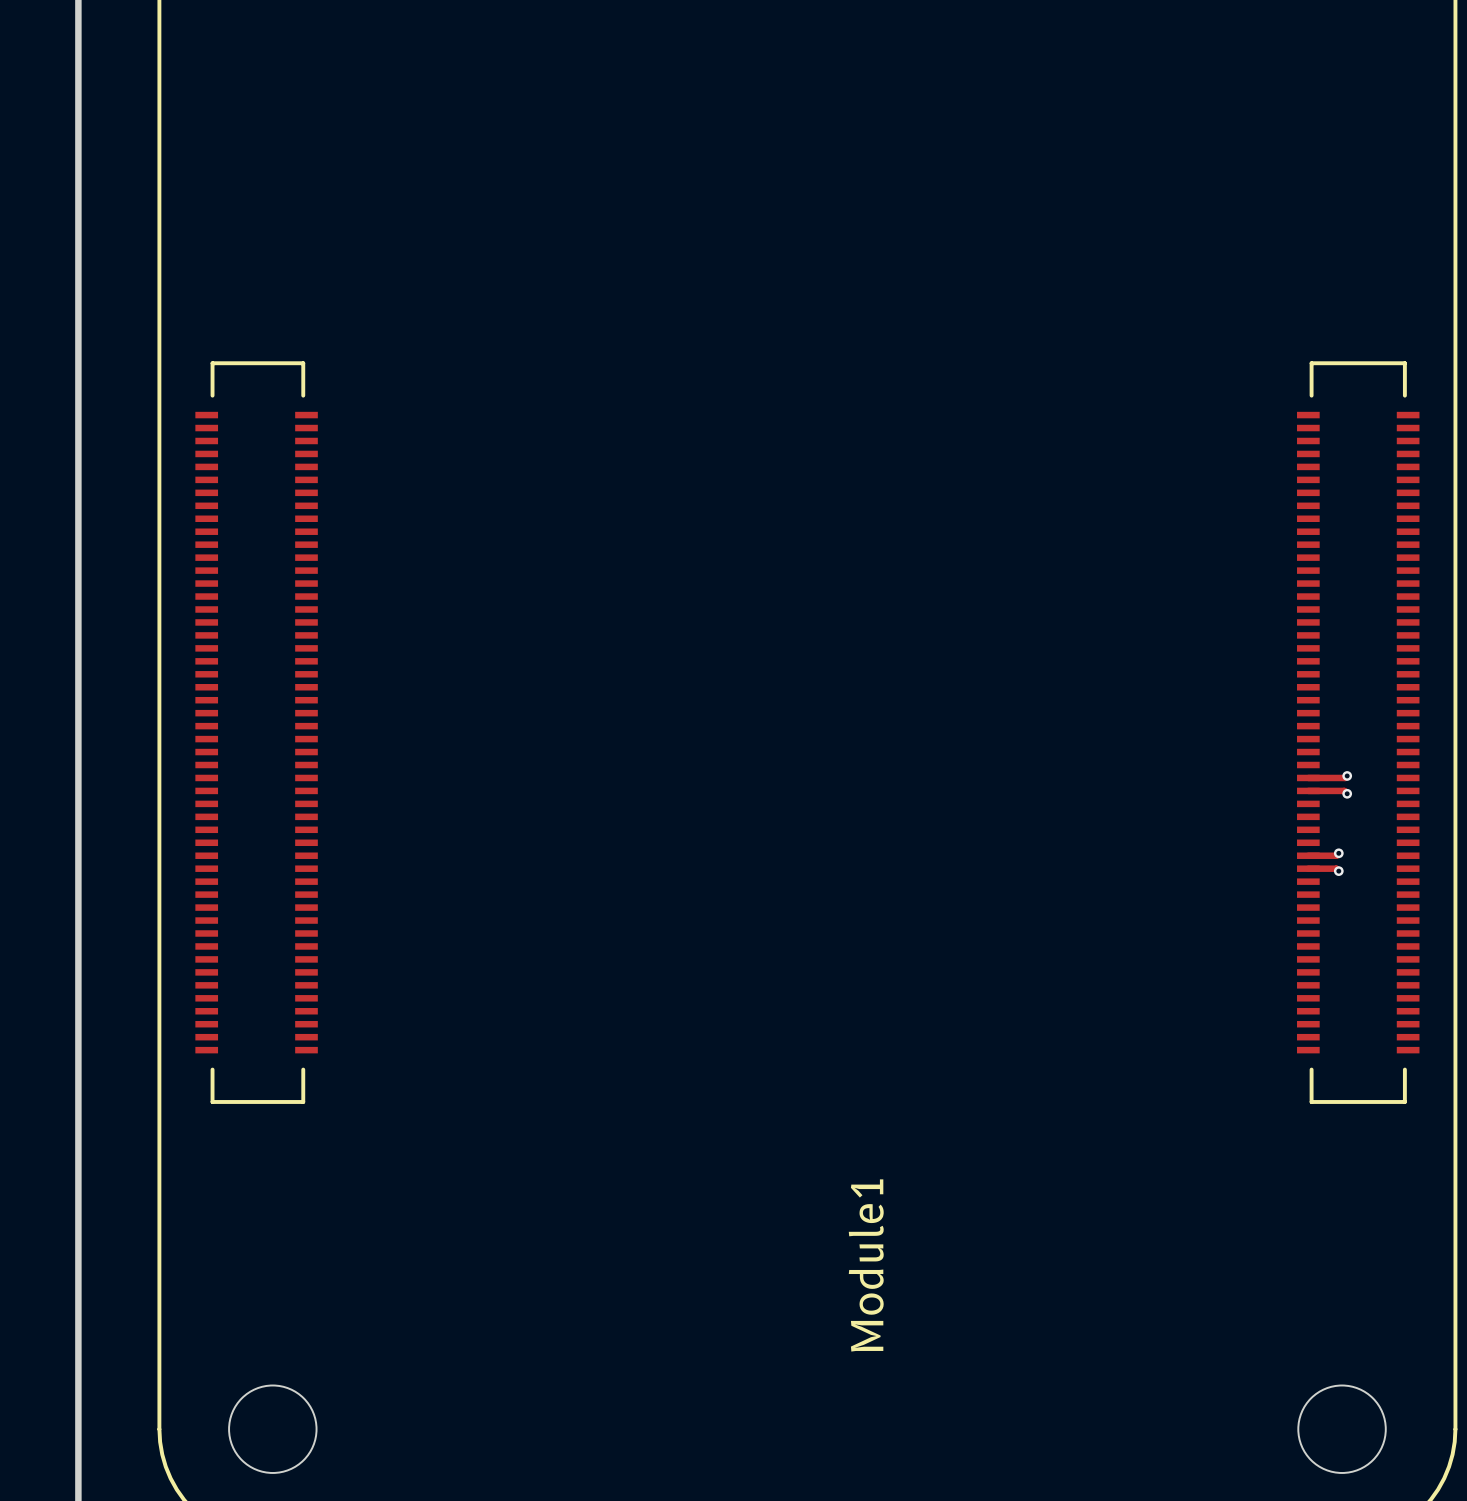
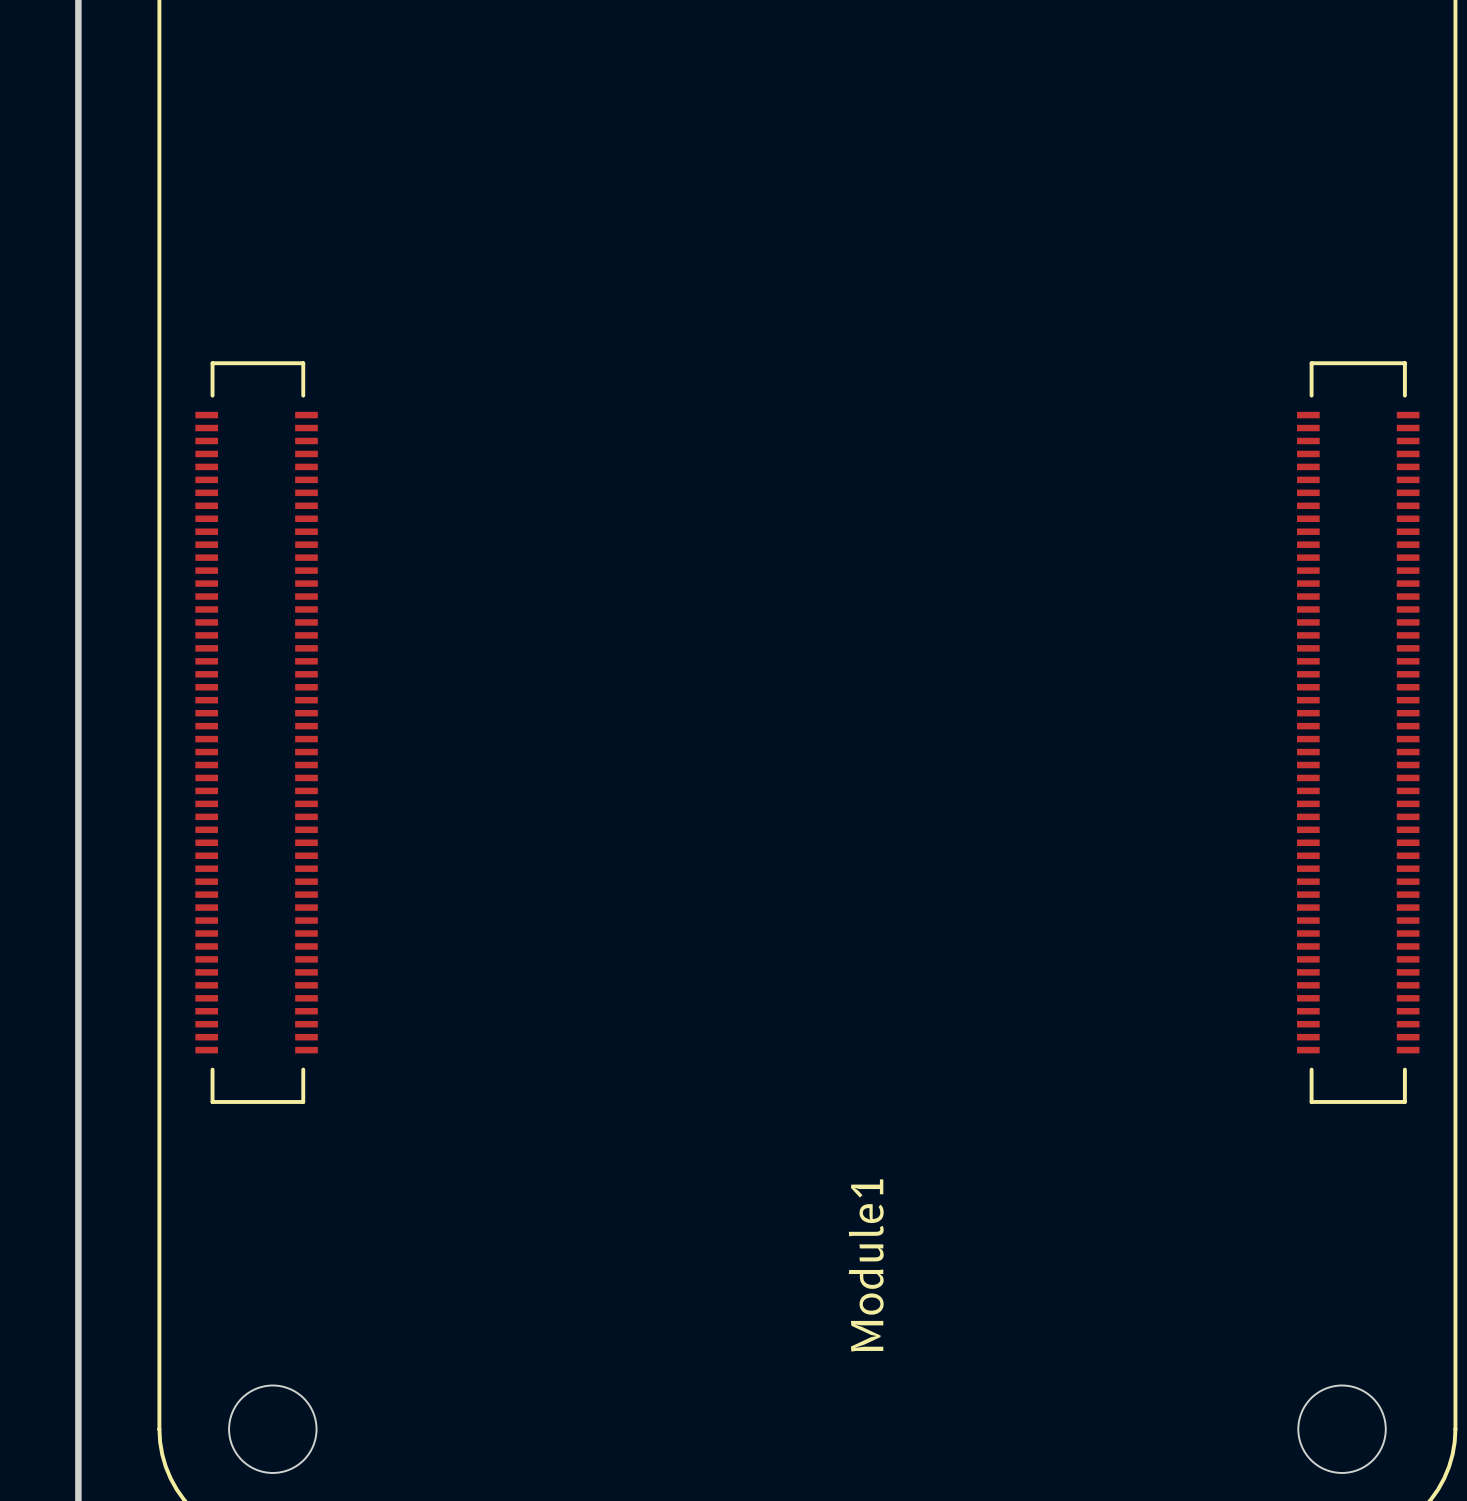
track: (1347, 775) (1345, 777) (1308, 777) -> none
via: (1347, 775) -> none
track: (1308, 790) (1344, 790) (1347, 793) -> none
via: (1347, 793) -> none
track: (1338, 853) (1336, 855) (1308, 855) -> none
via: (1338, 853) -> none
track: (1308, 868) (1336, 868) (1338, 871) -> none
via: (1338, 871) -> none

